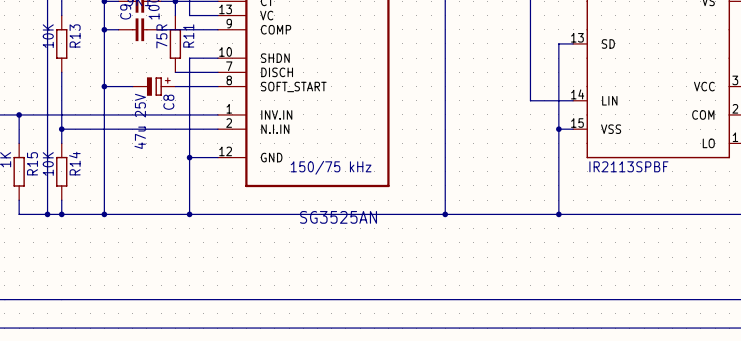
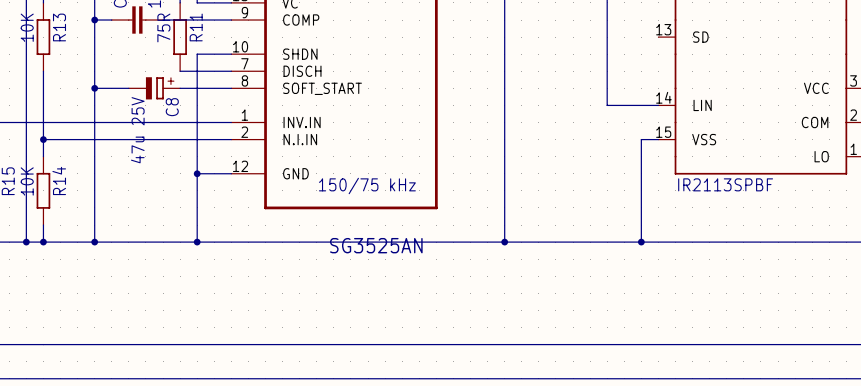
wire: (573, 43) (558, 43) (558, 129) -> none
junction: (558, 129) -> none

